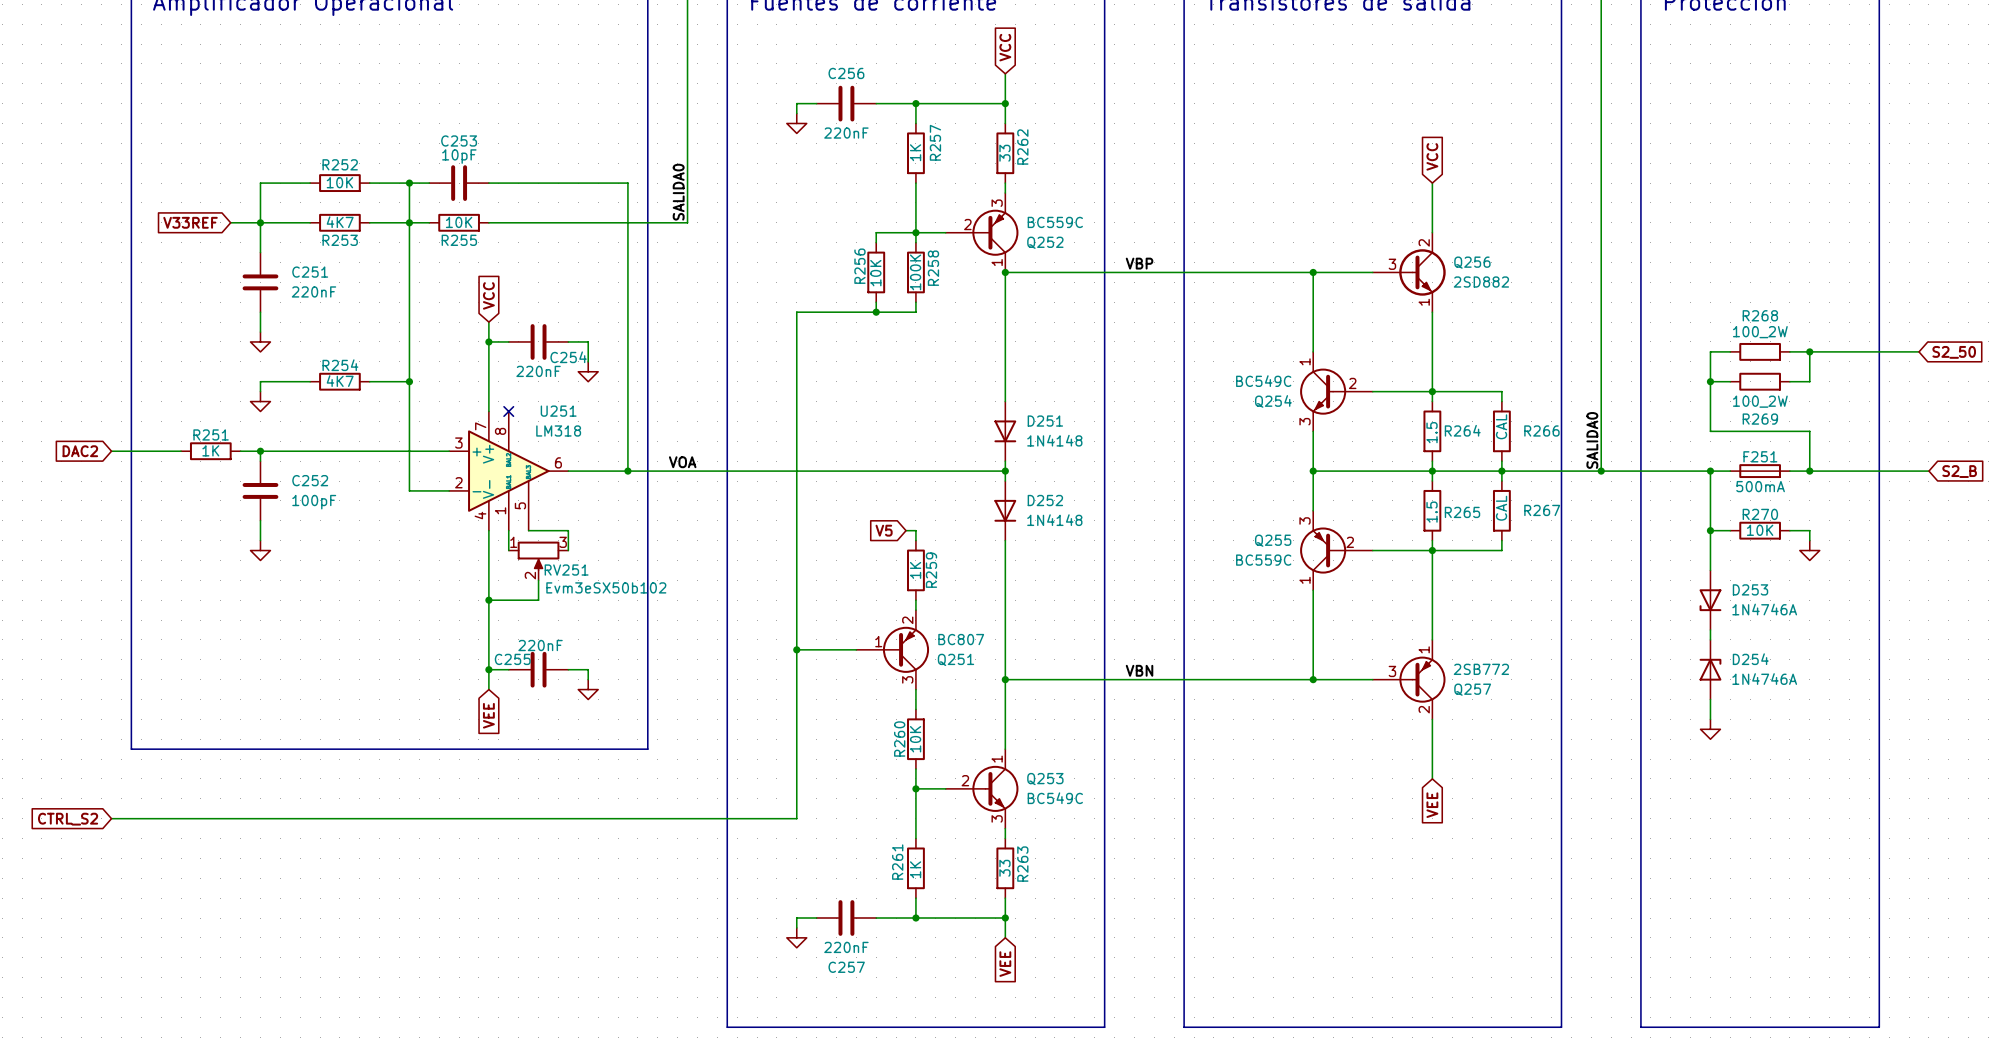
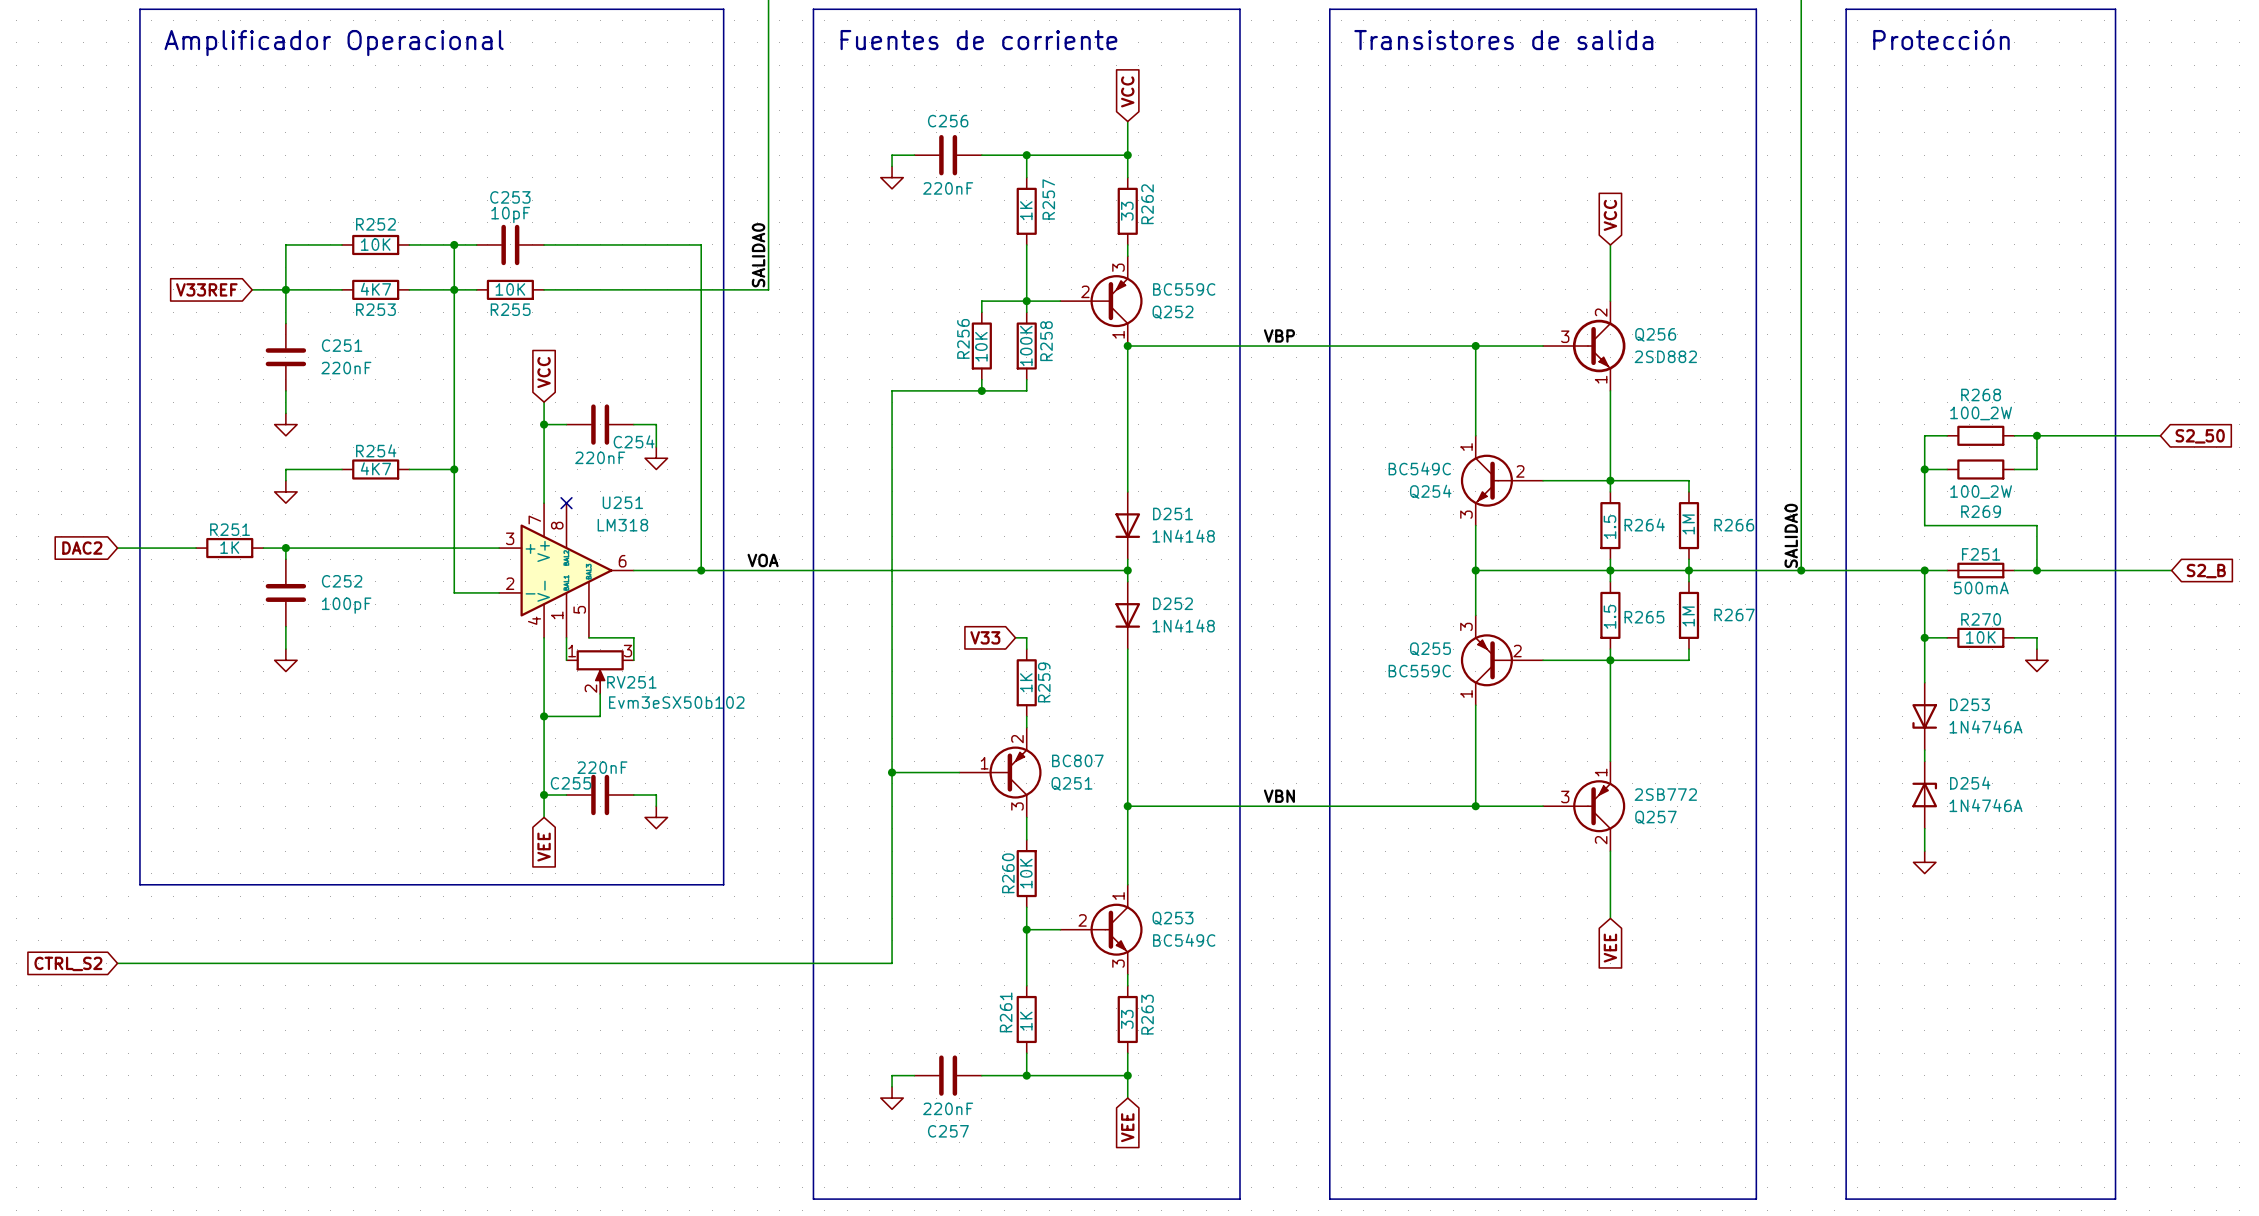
R266 value: CAL (1501, 426) -> 1M (1688, 524)
R267 value: CAL (1501, 508) -> 1M (1688, 616)
global label: V5 (884, 530) -> V33 (985, 637)

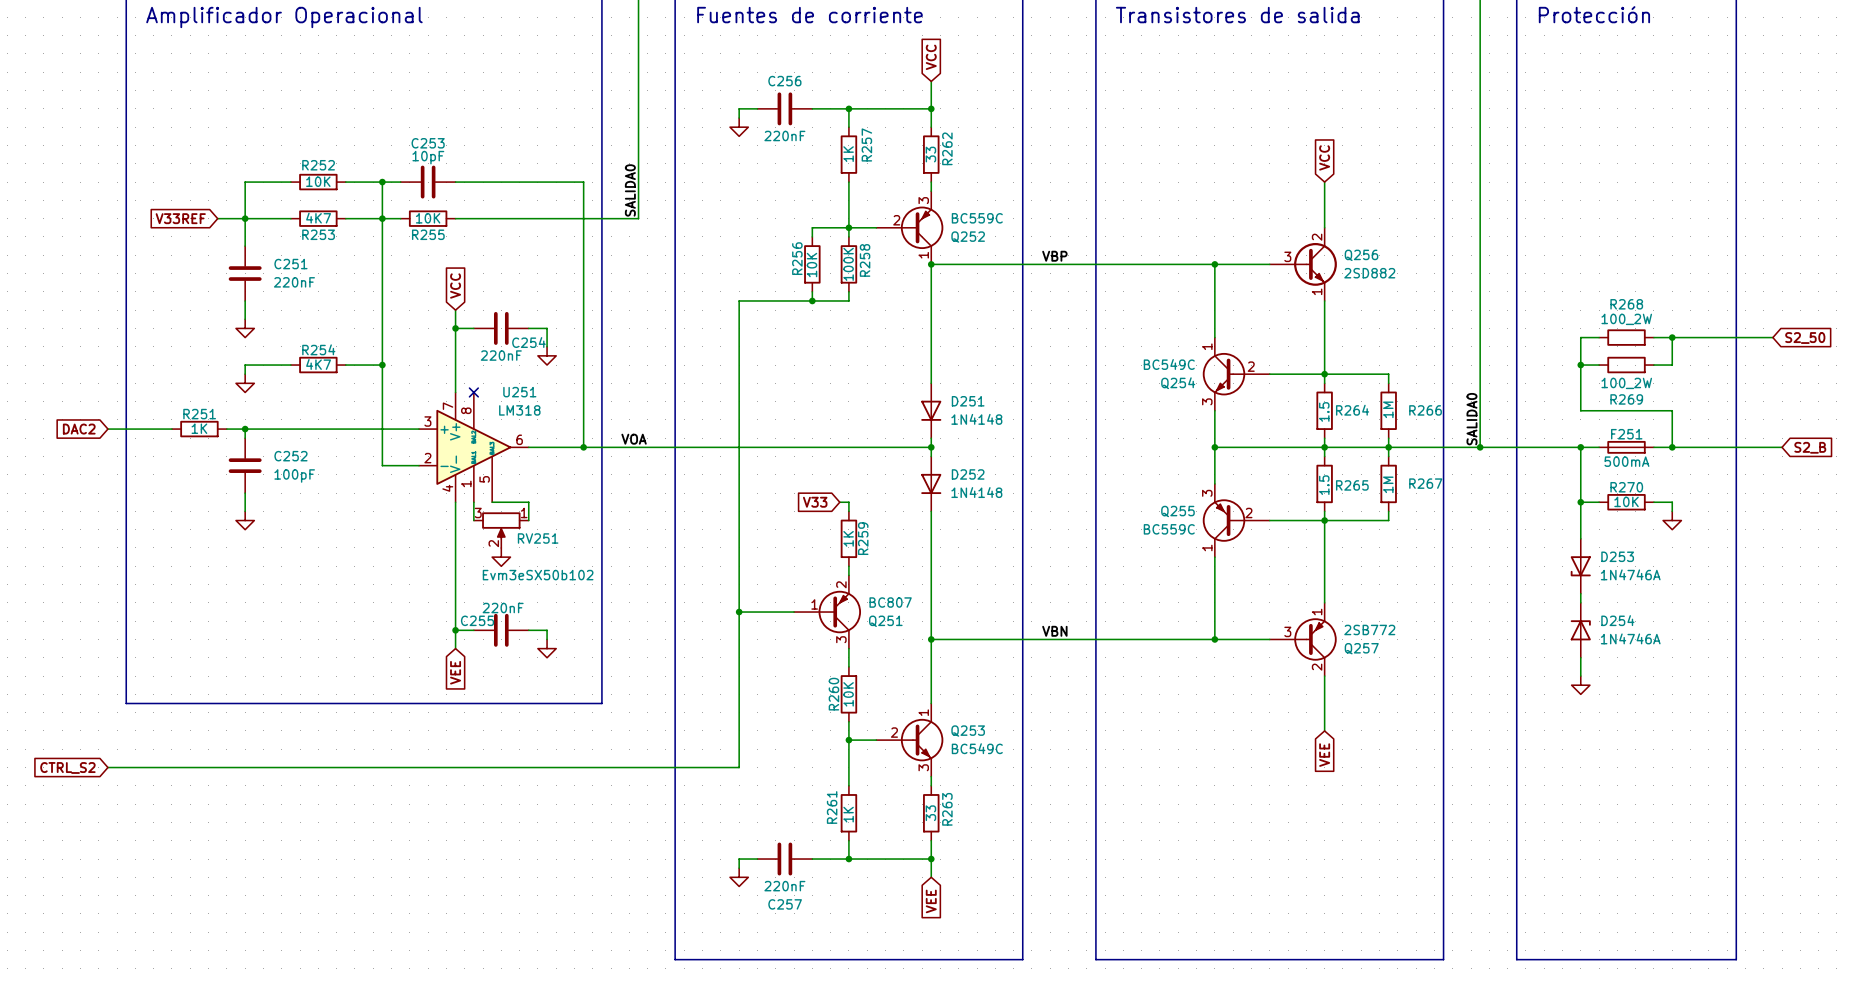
RV251 flip: as is (600, 666) -> left-right (501, 525)
wire: (600, 693) (600, 716) (544, 716) -> none
RV251 value position: Evm3eSX50b102 (676, 702) -> Evm3eSX50b102 (538, 575)
power symbol: none -> (501, 557)
junction: (544, 716) -> none

